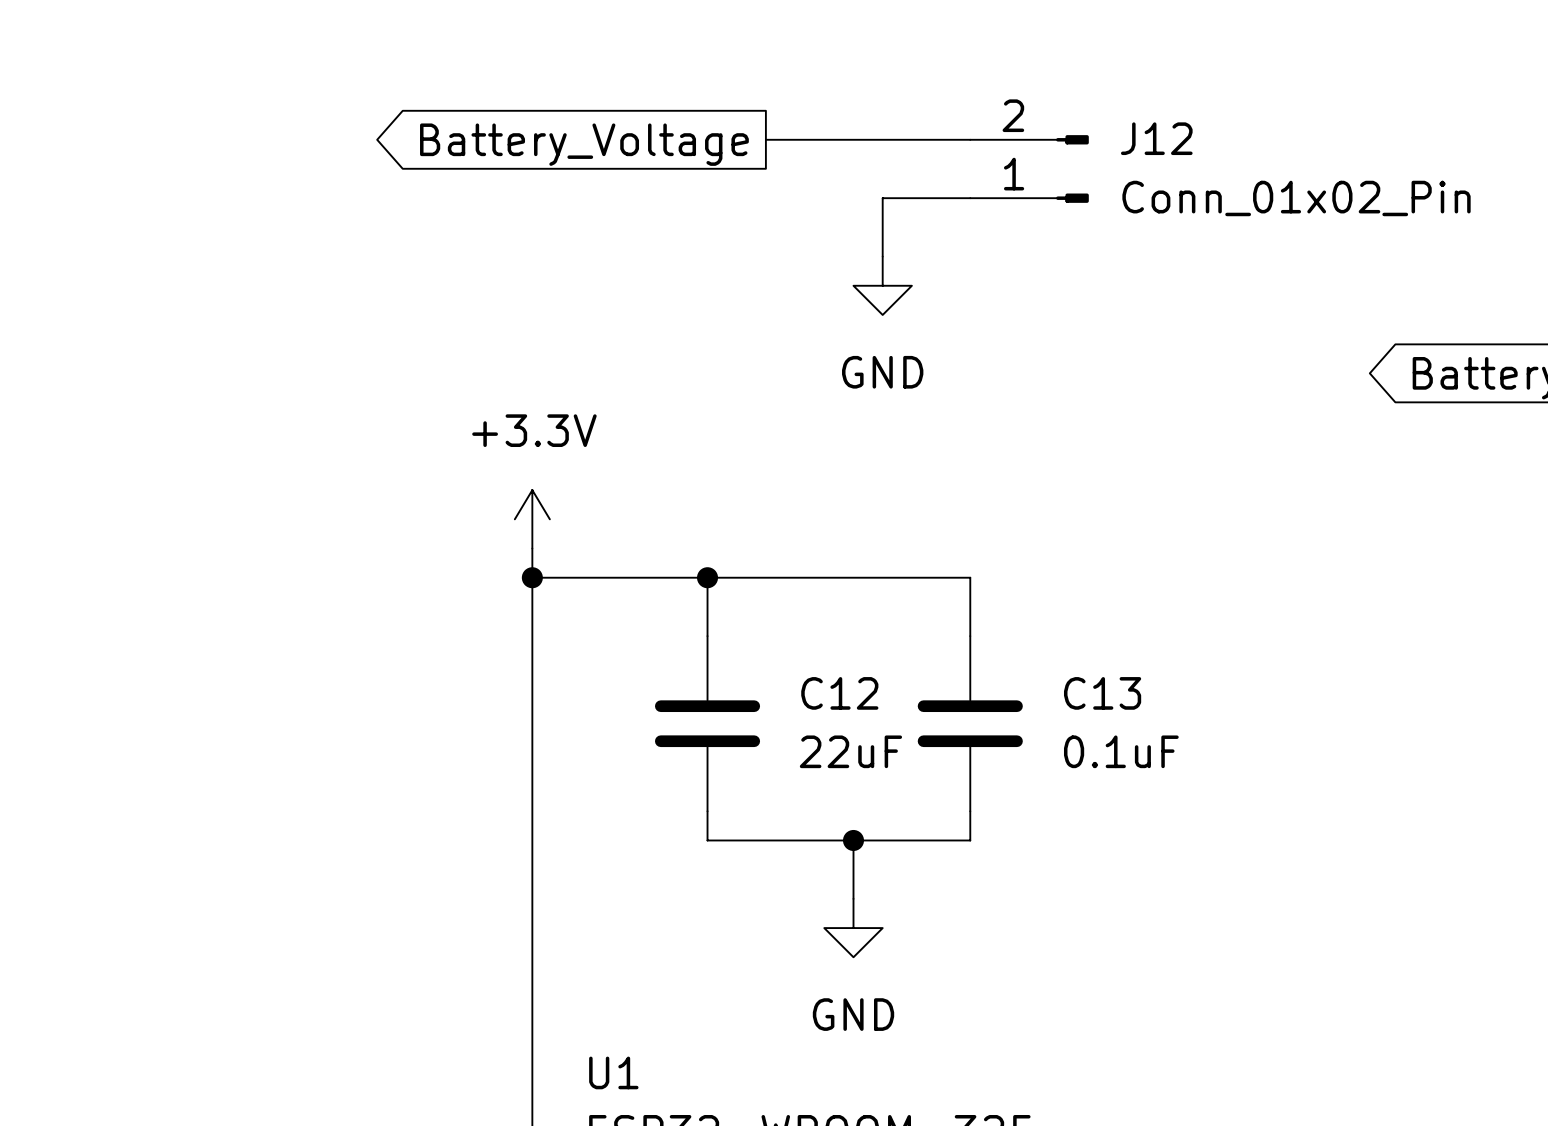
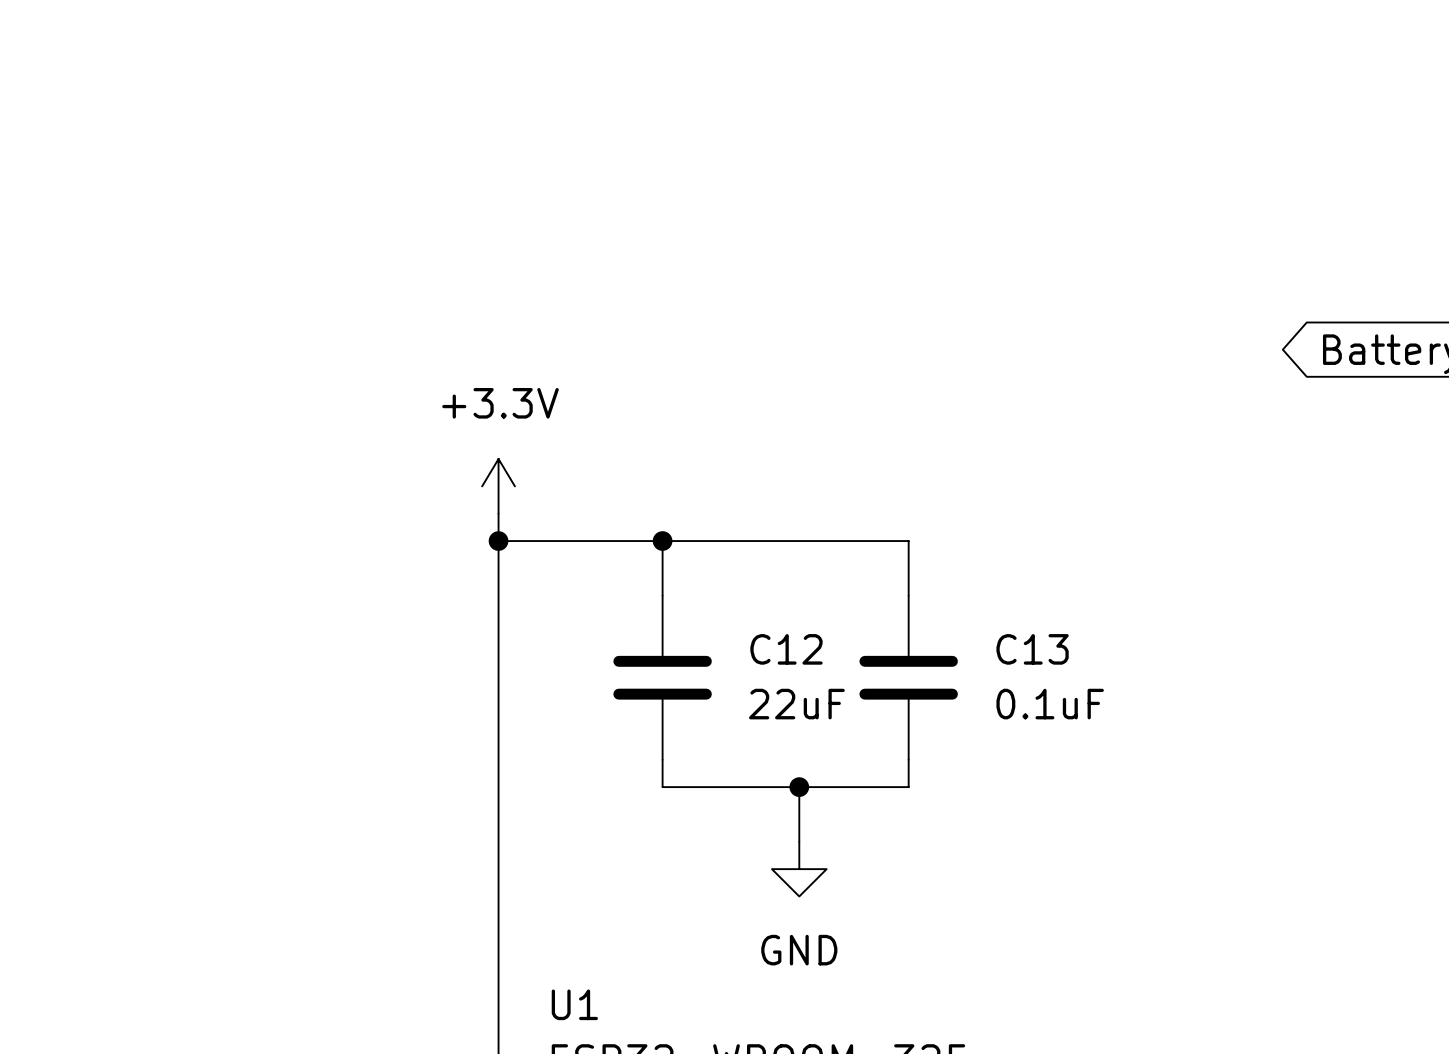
wire: (765, 139) (970, 139) -> none
global label: Battery_Voltage (584, 144) -> none
J12: Conn_01x02_Pin (1029, 168) -> none
wire: (970, 198) (882, 198) (882, 256) -> none
power symbol: GND (882, 285) -> none

